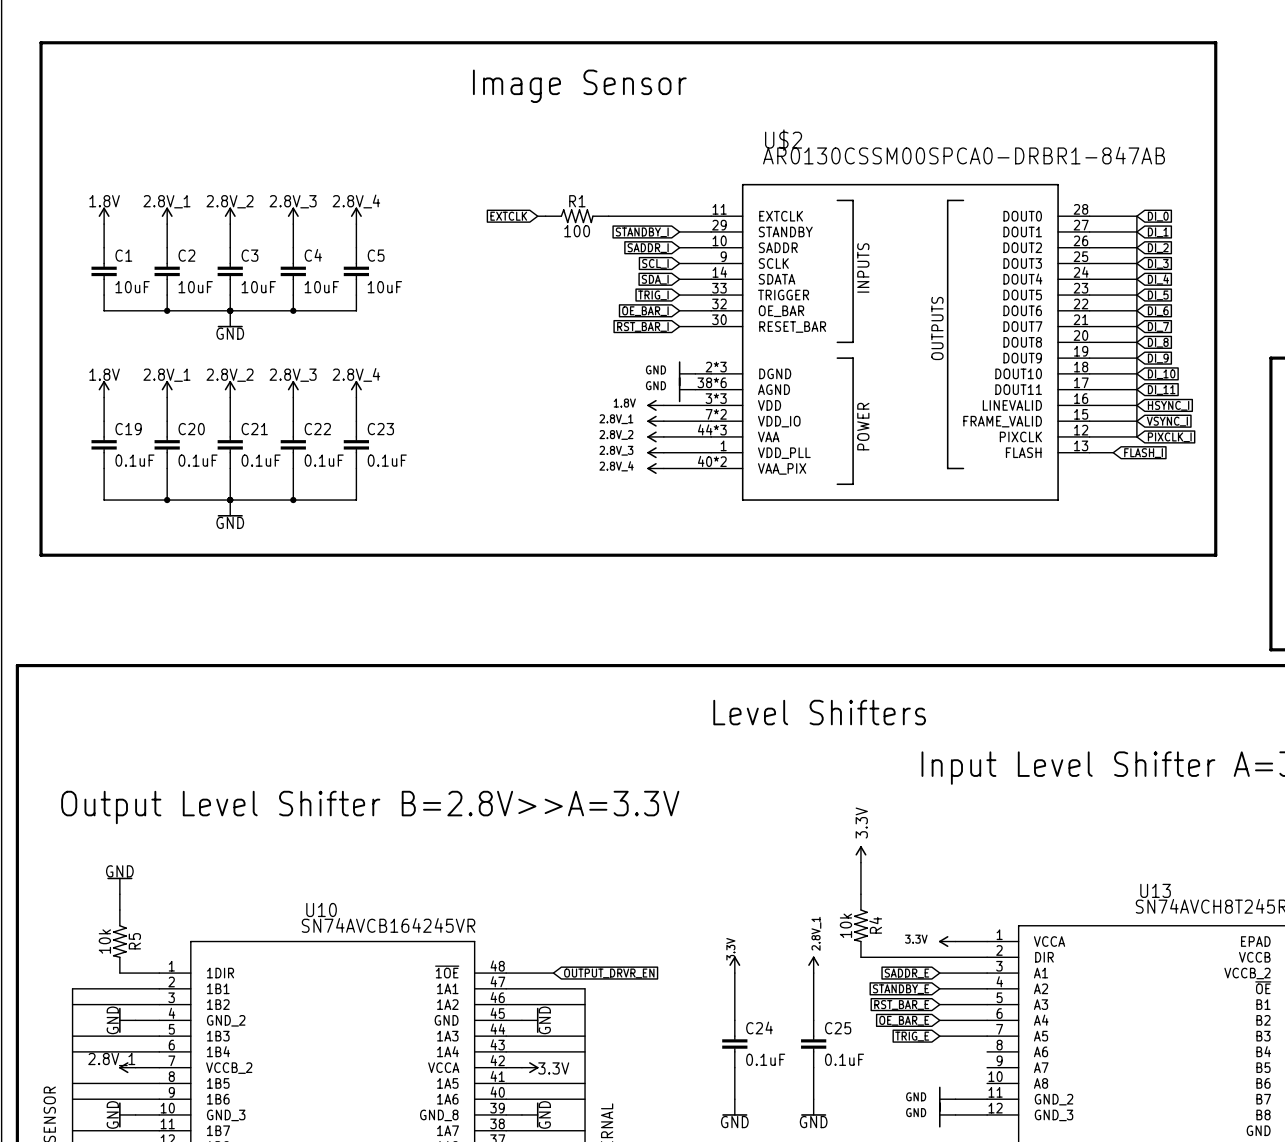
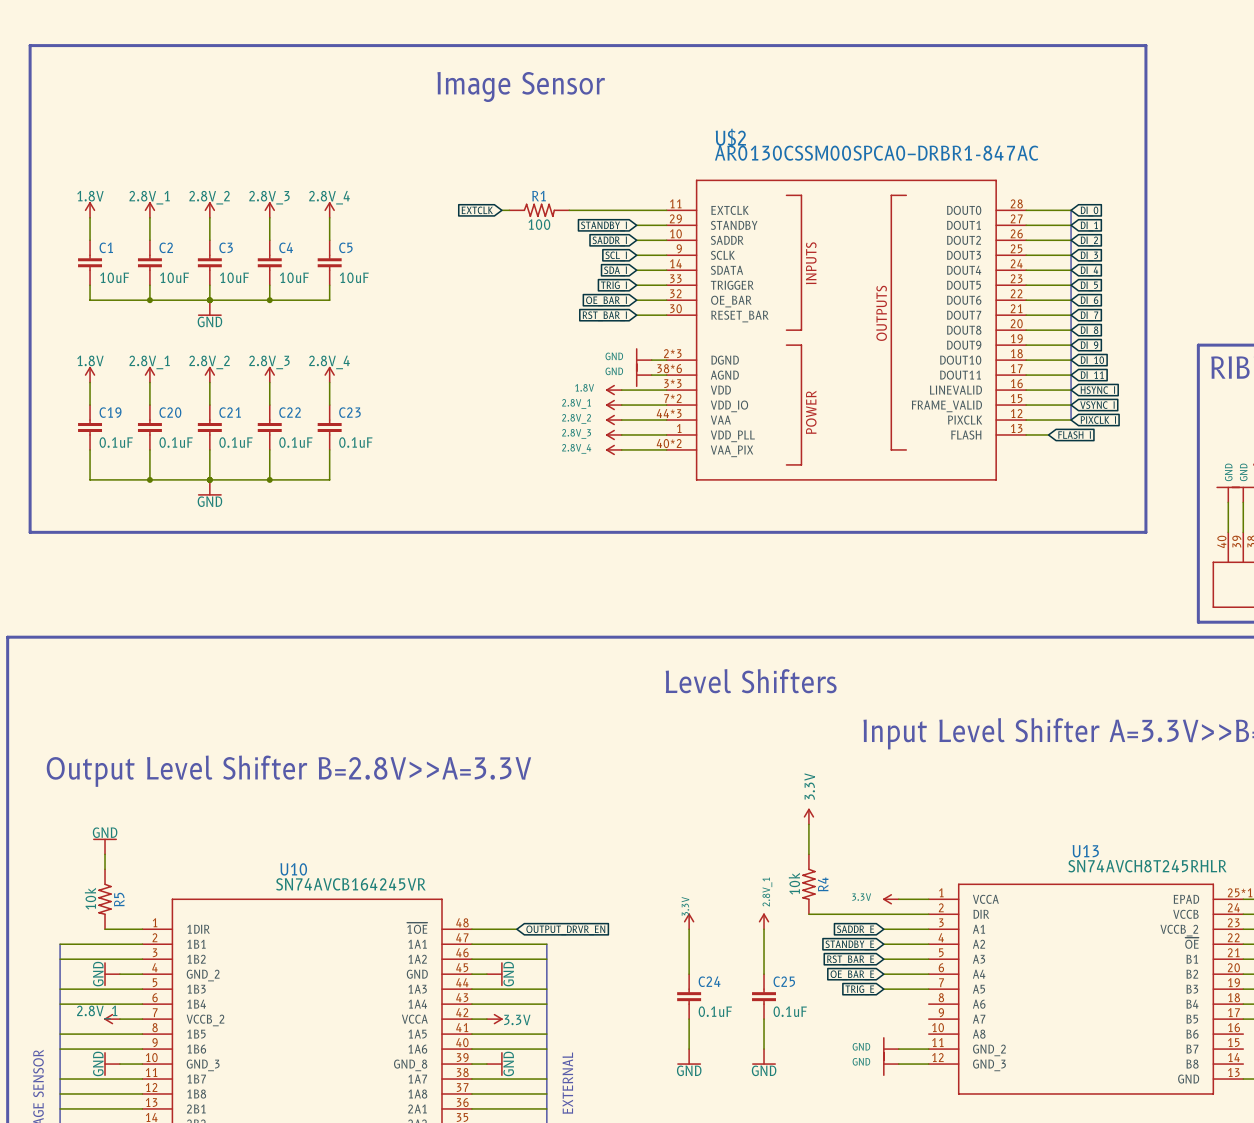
U$2 value: AR0130CSSM00SPCA0−DRBR1-847AB (964, 155) -> AR0130CSSM00SPCA0−DRBR1-847AC (876, 153)

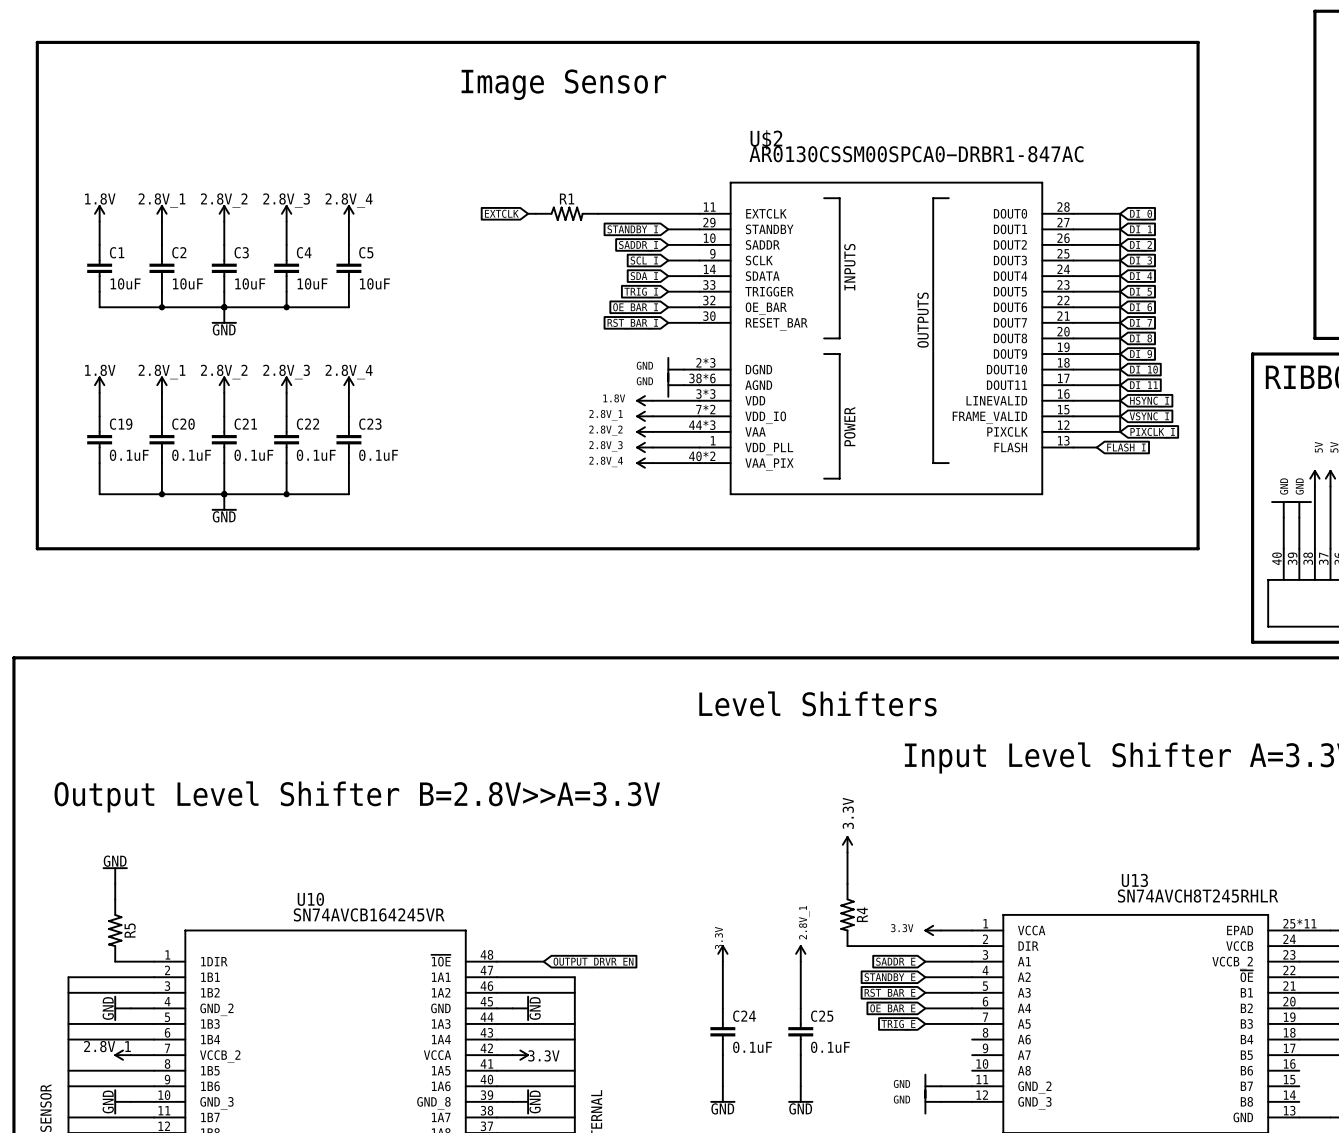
R1 value: 100 (539, 224) -> none
R4 value: 10k (794, 883) -> none
R5 value: 10k (90, 898) -> none

